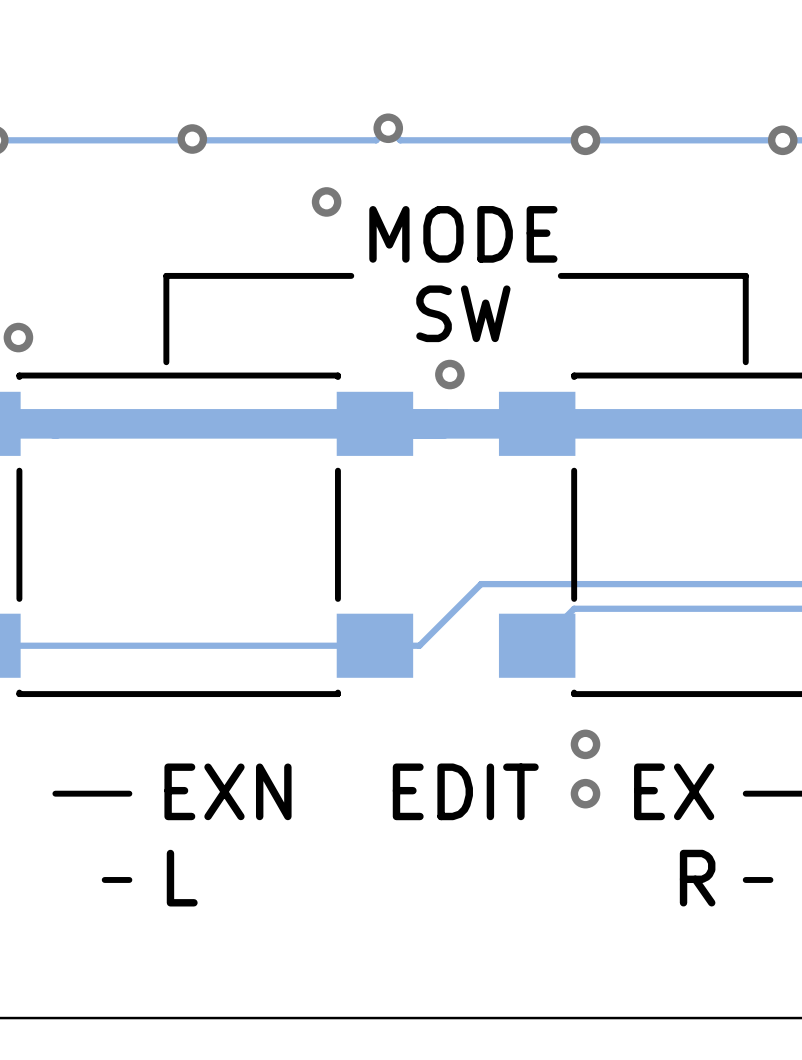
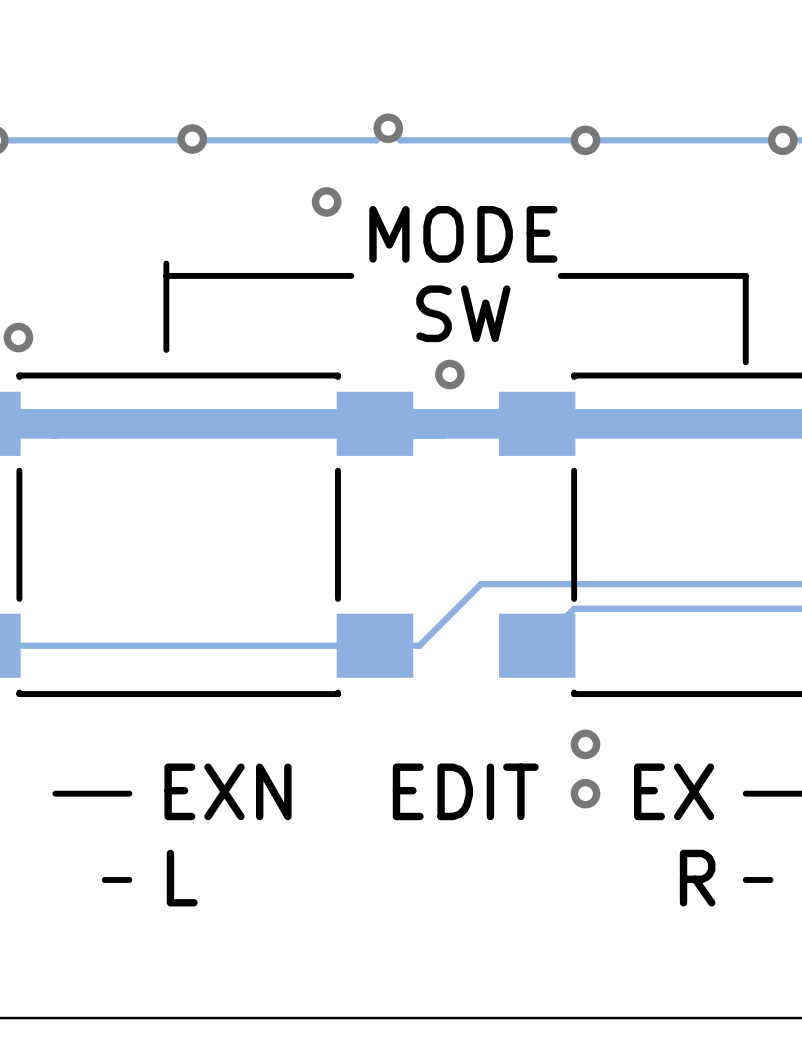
line: (166, 349) (166, 362) -> (166, 263) (166, 275)

